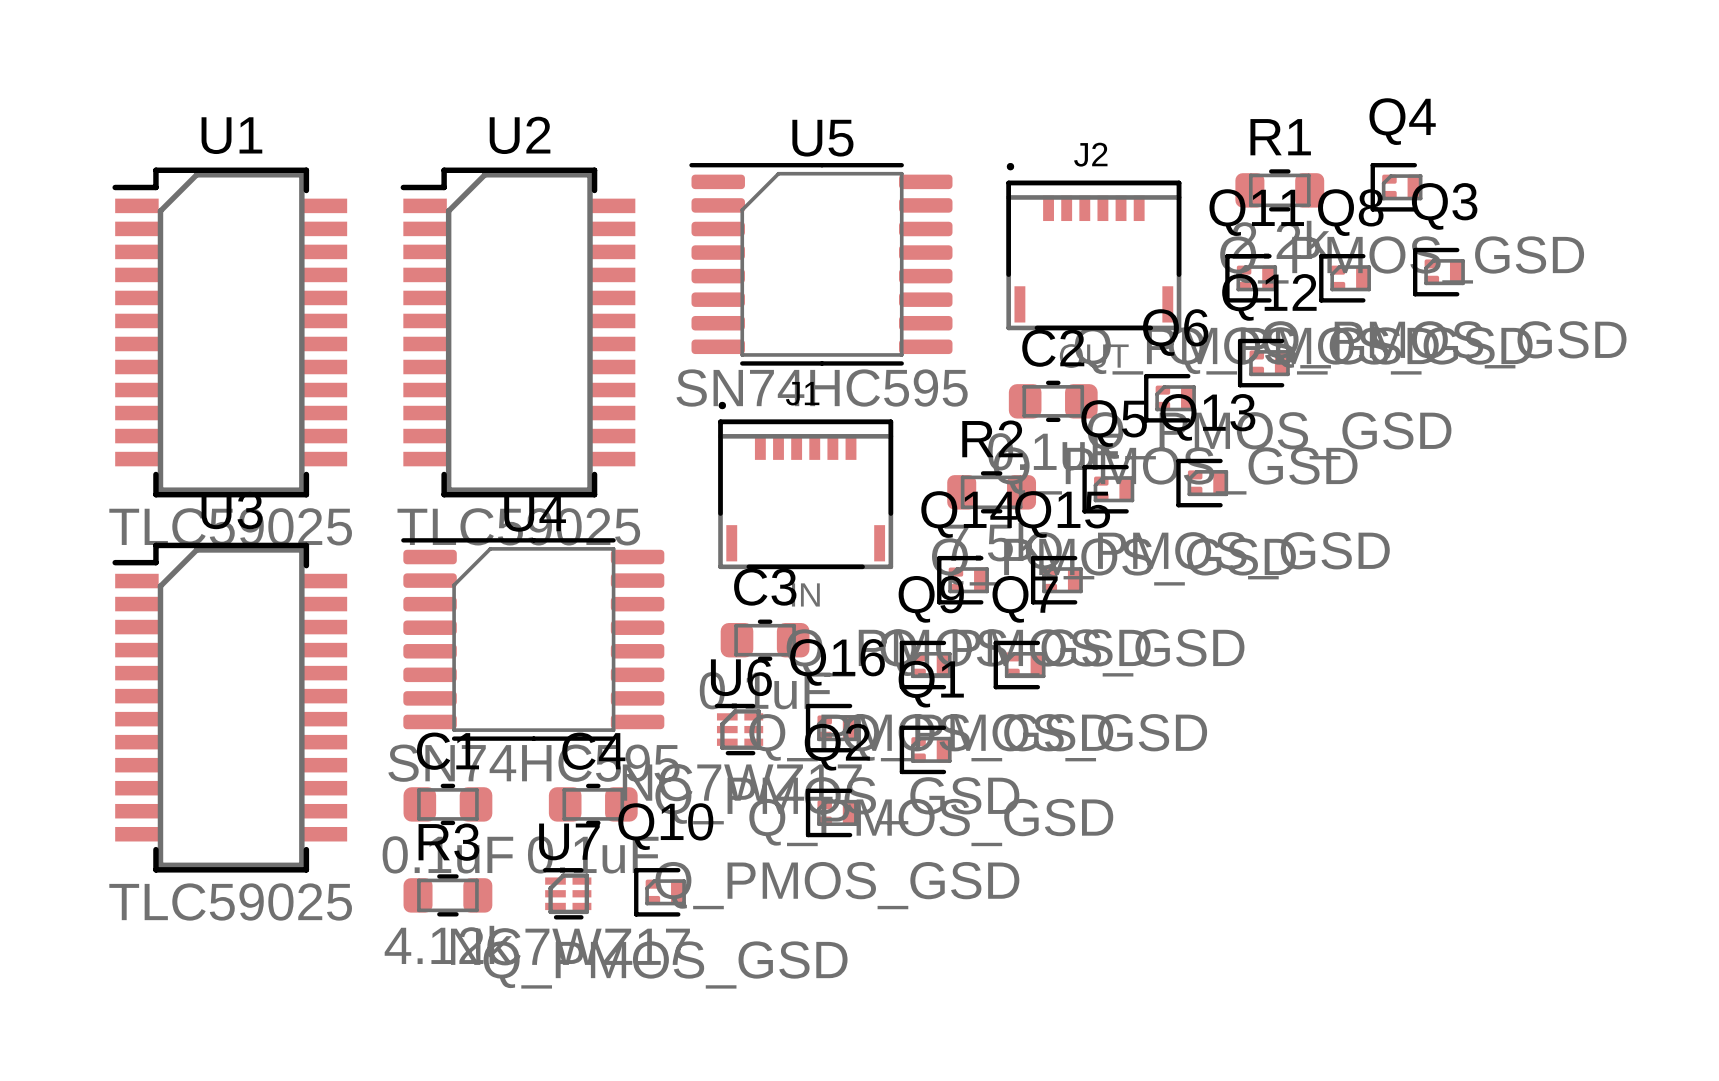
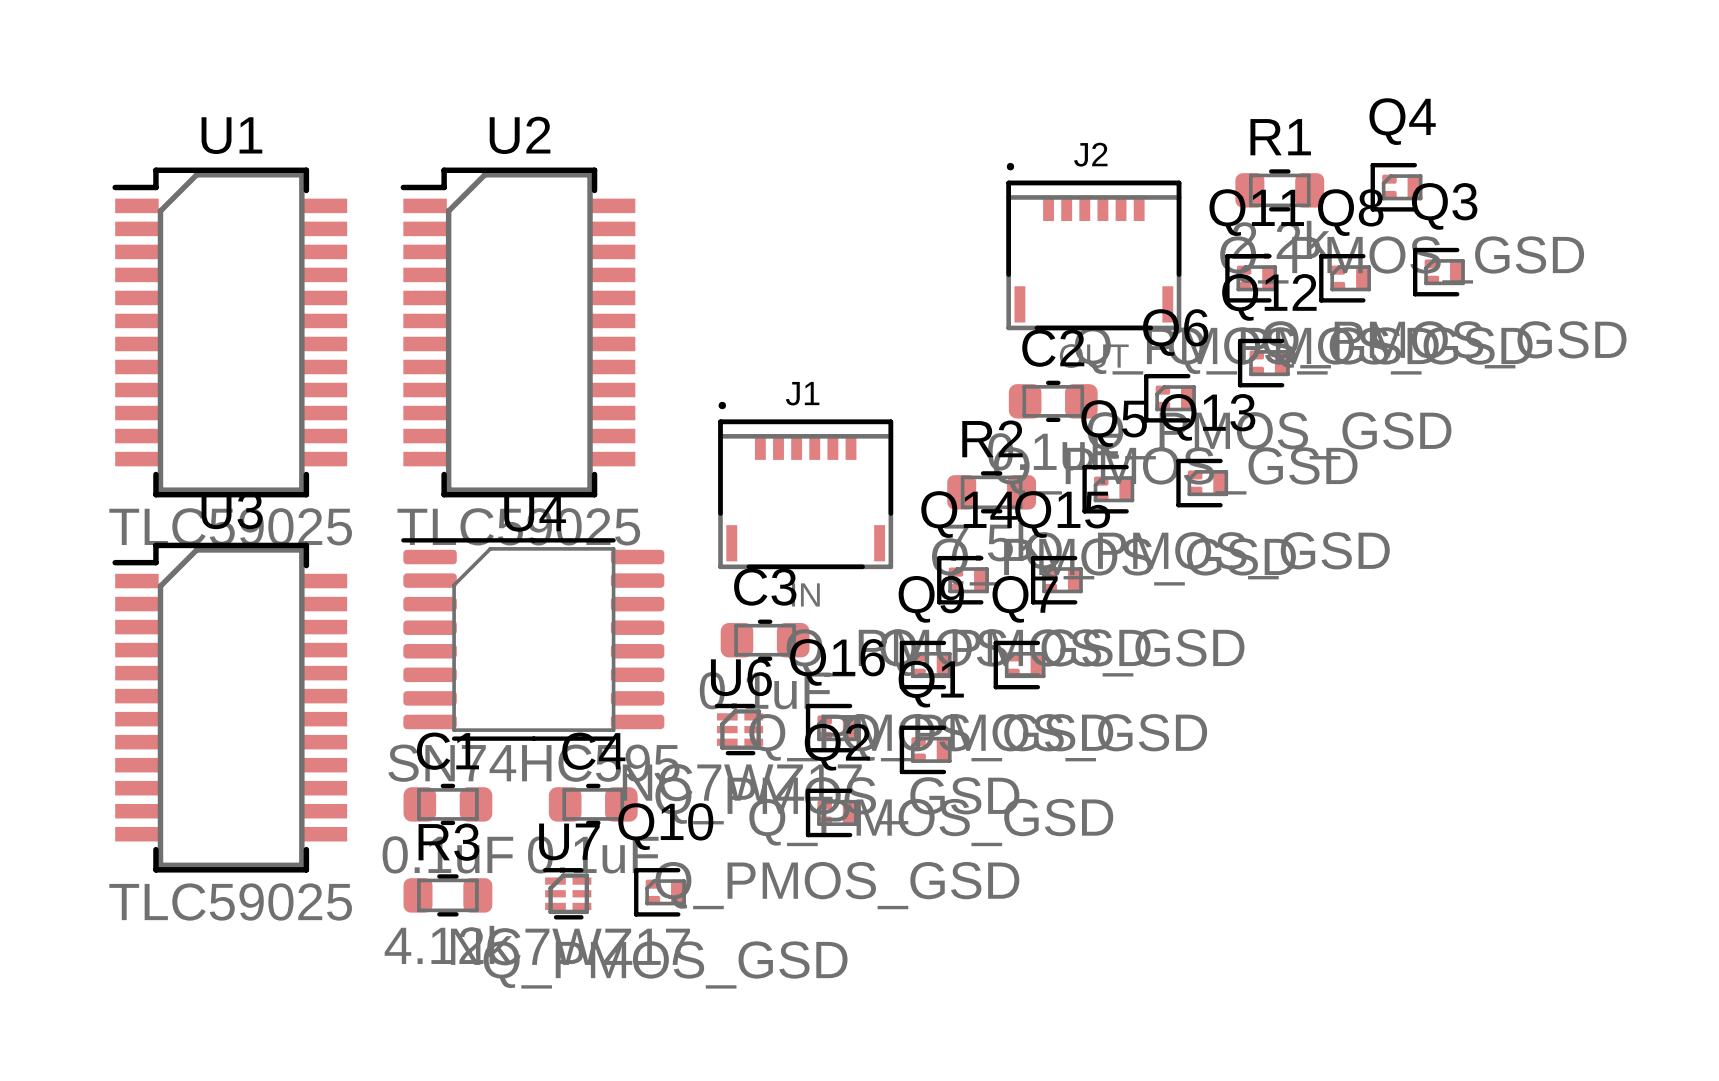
U5: SN74HC595 (820, 264) -> none

